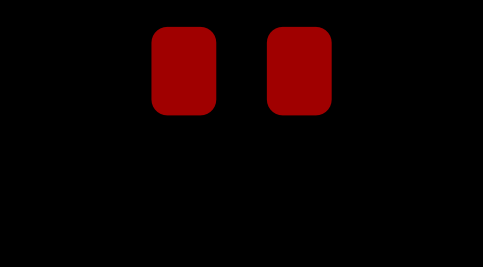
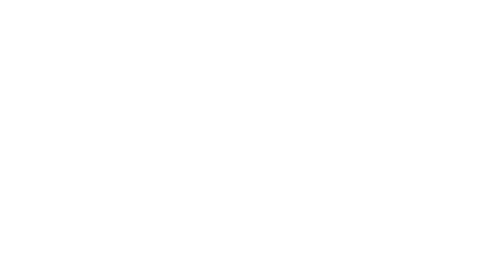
part: (241, 71) -> none

